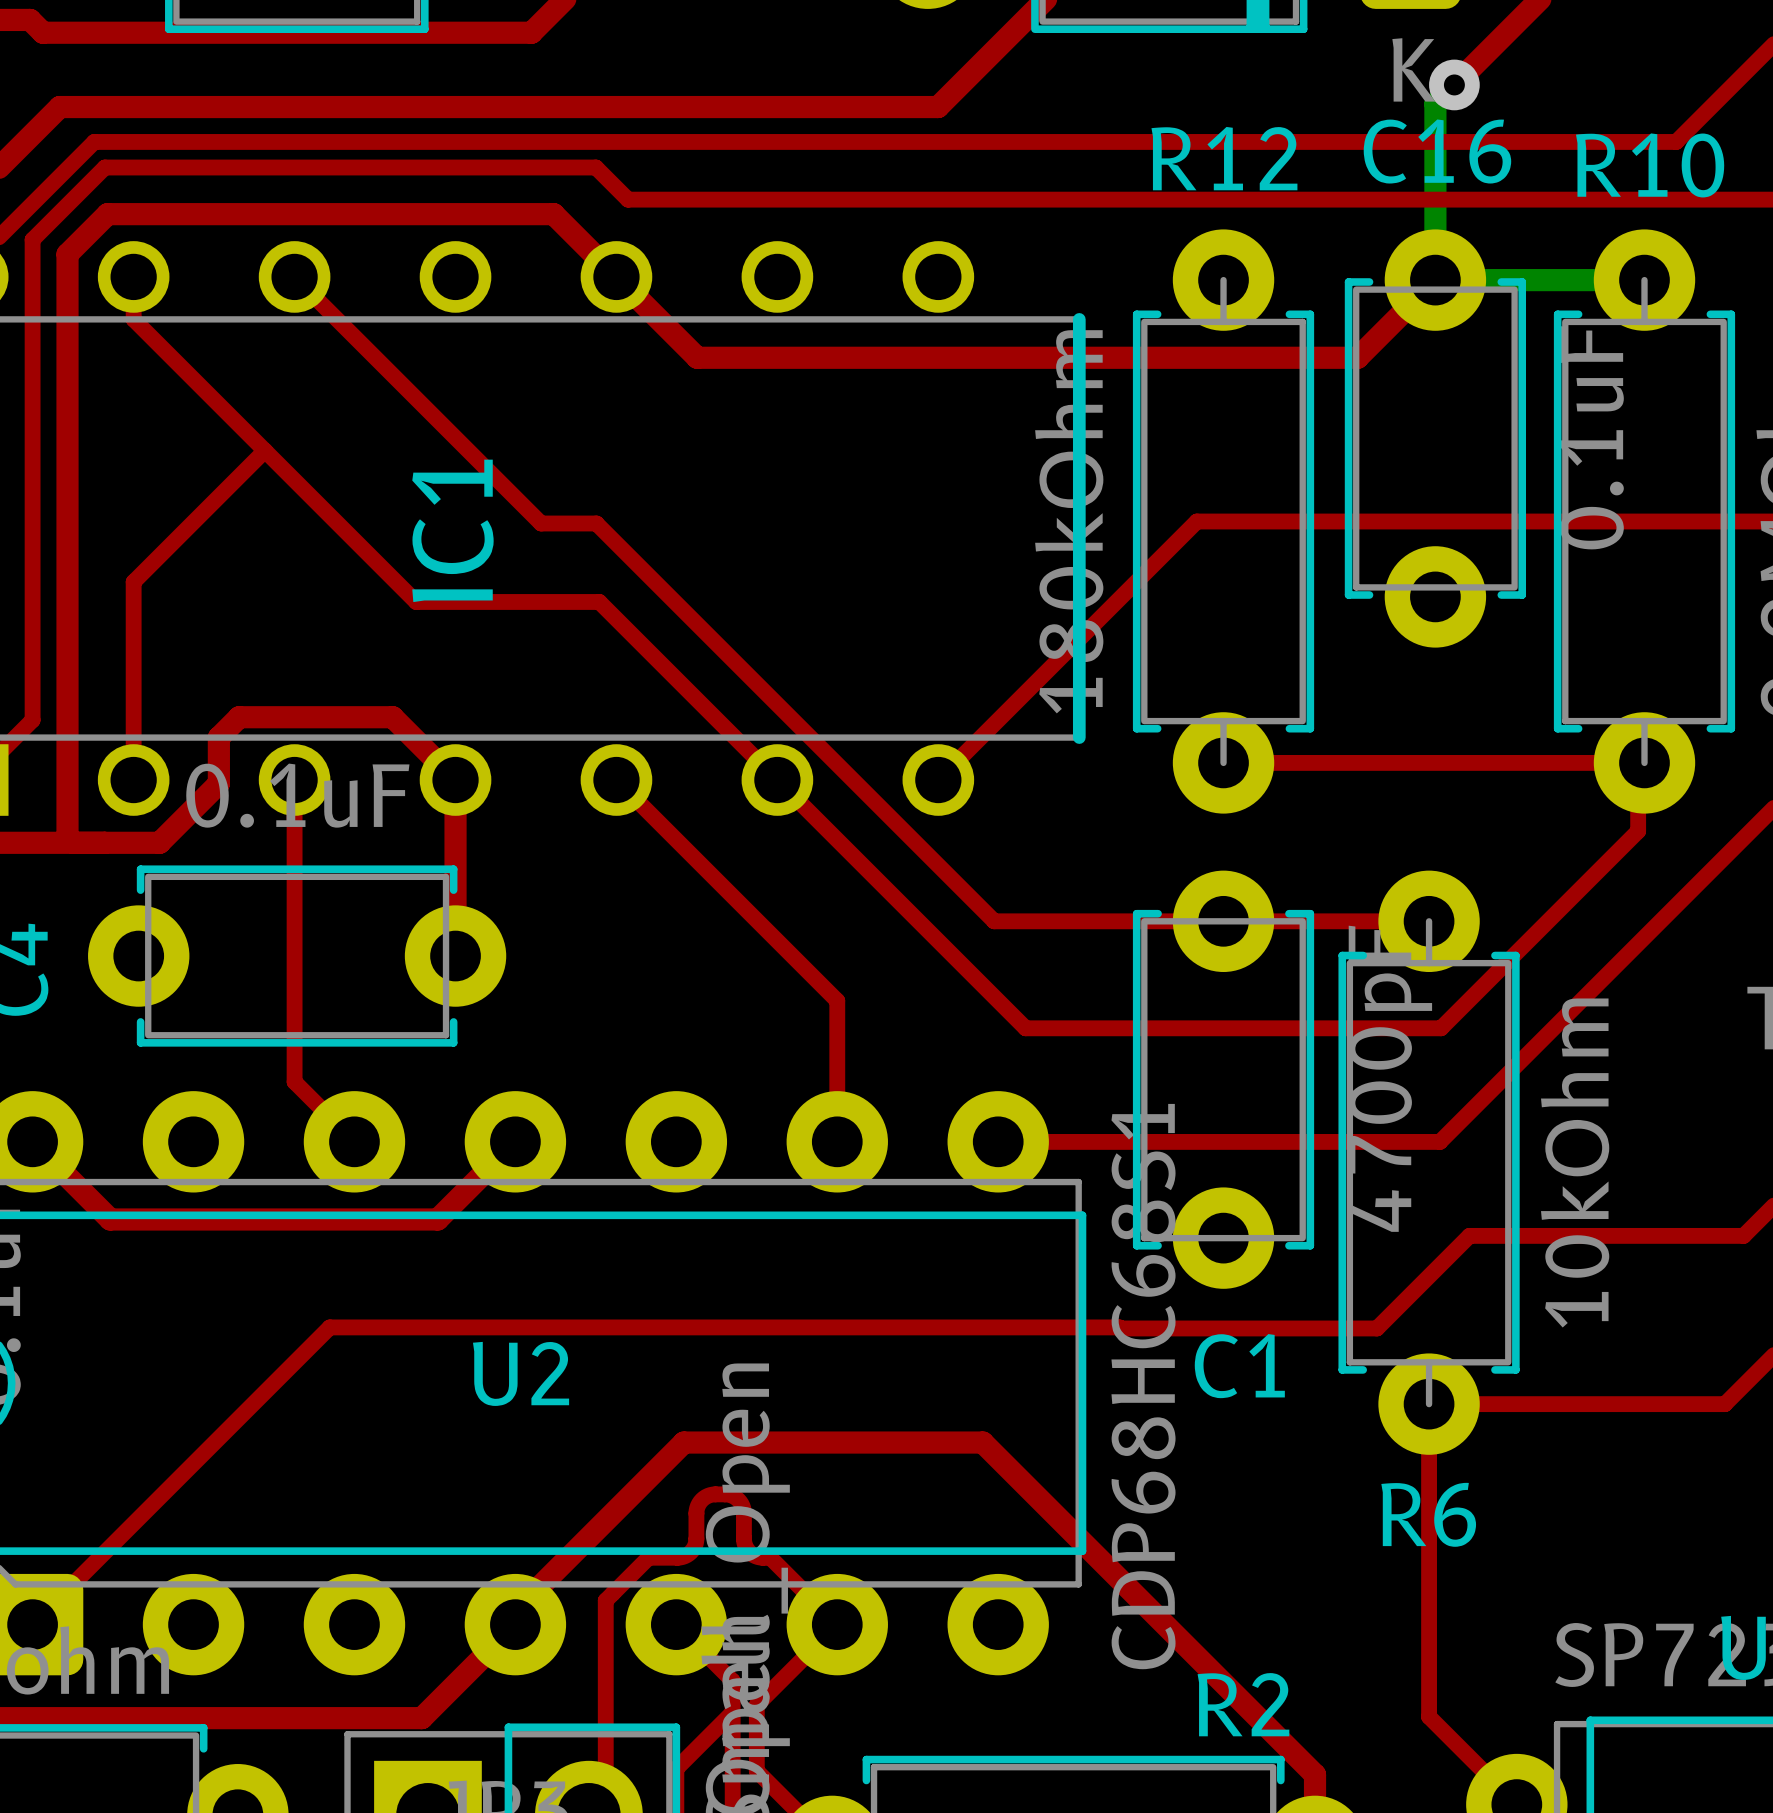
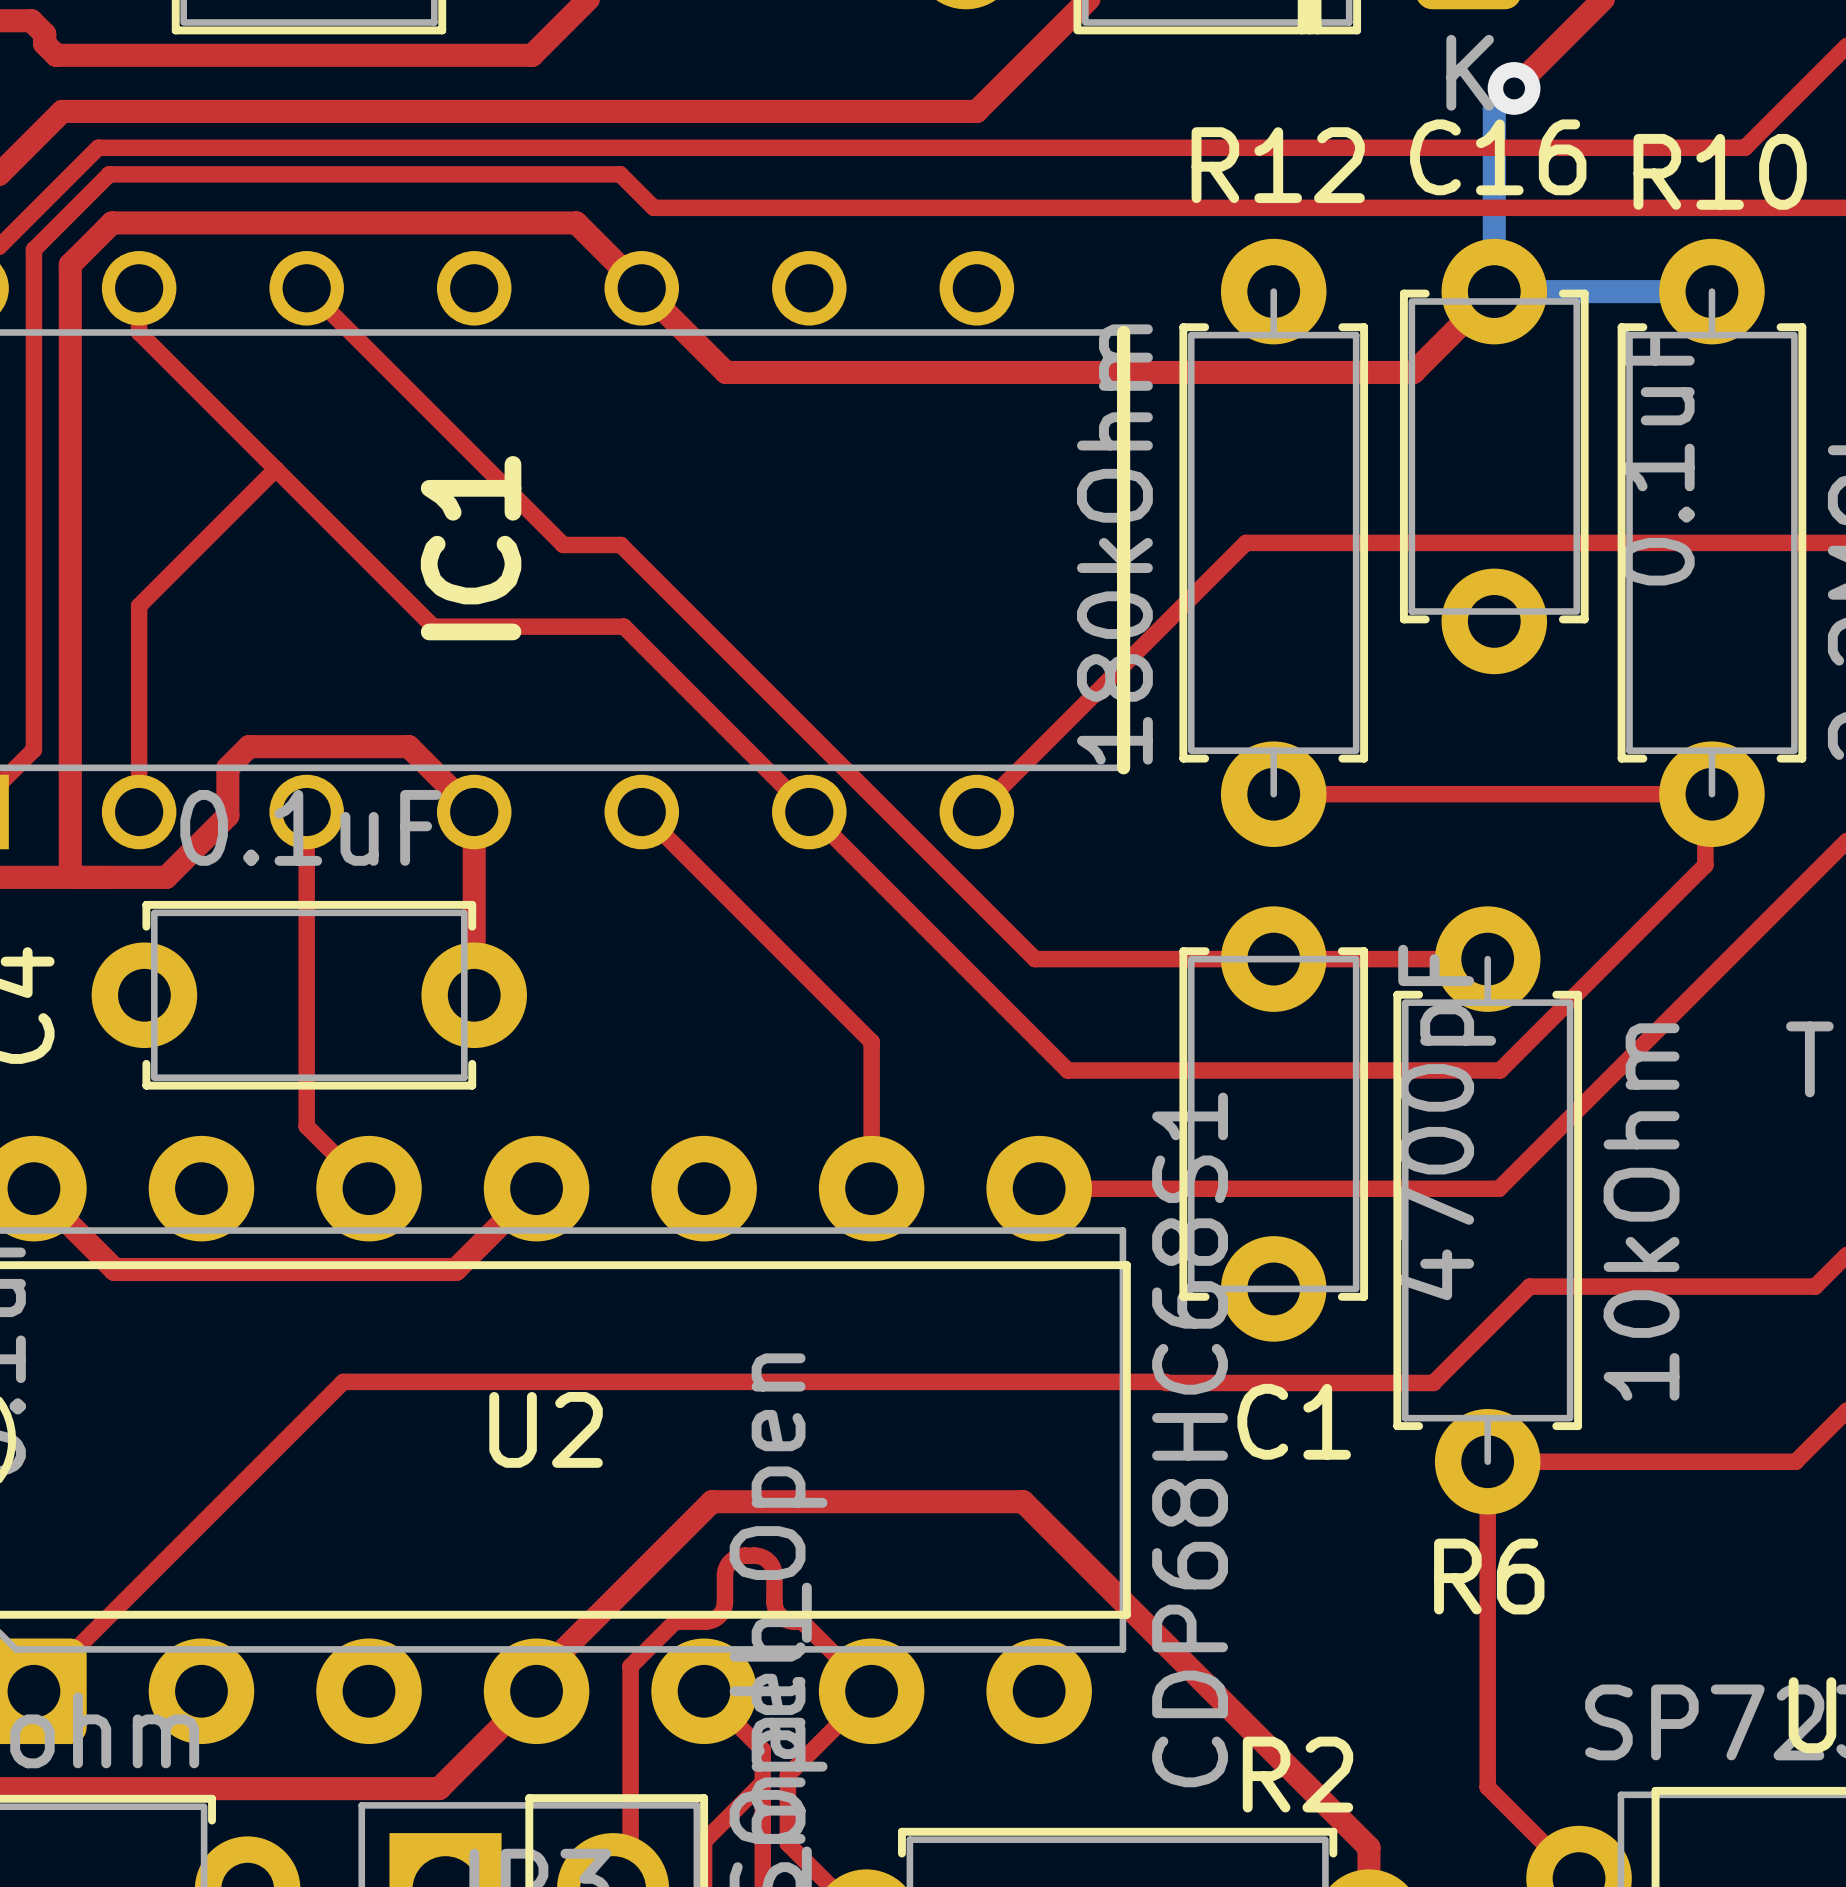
top track: (42, 32) (531, 32) -> (44, 34) (44, 43) (56, 55) (532, 55) (553, 34)

